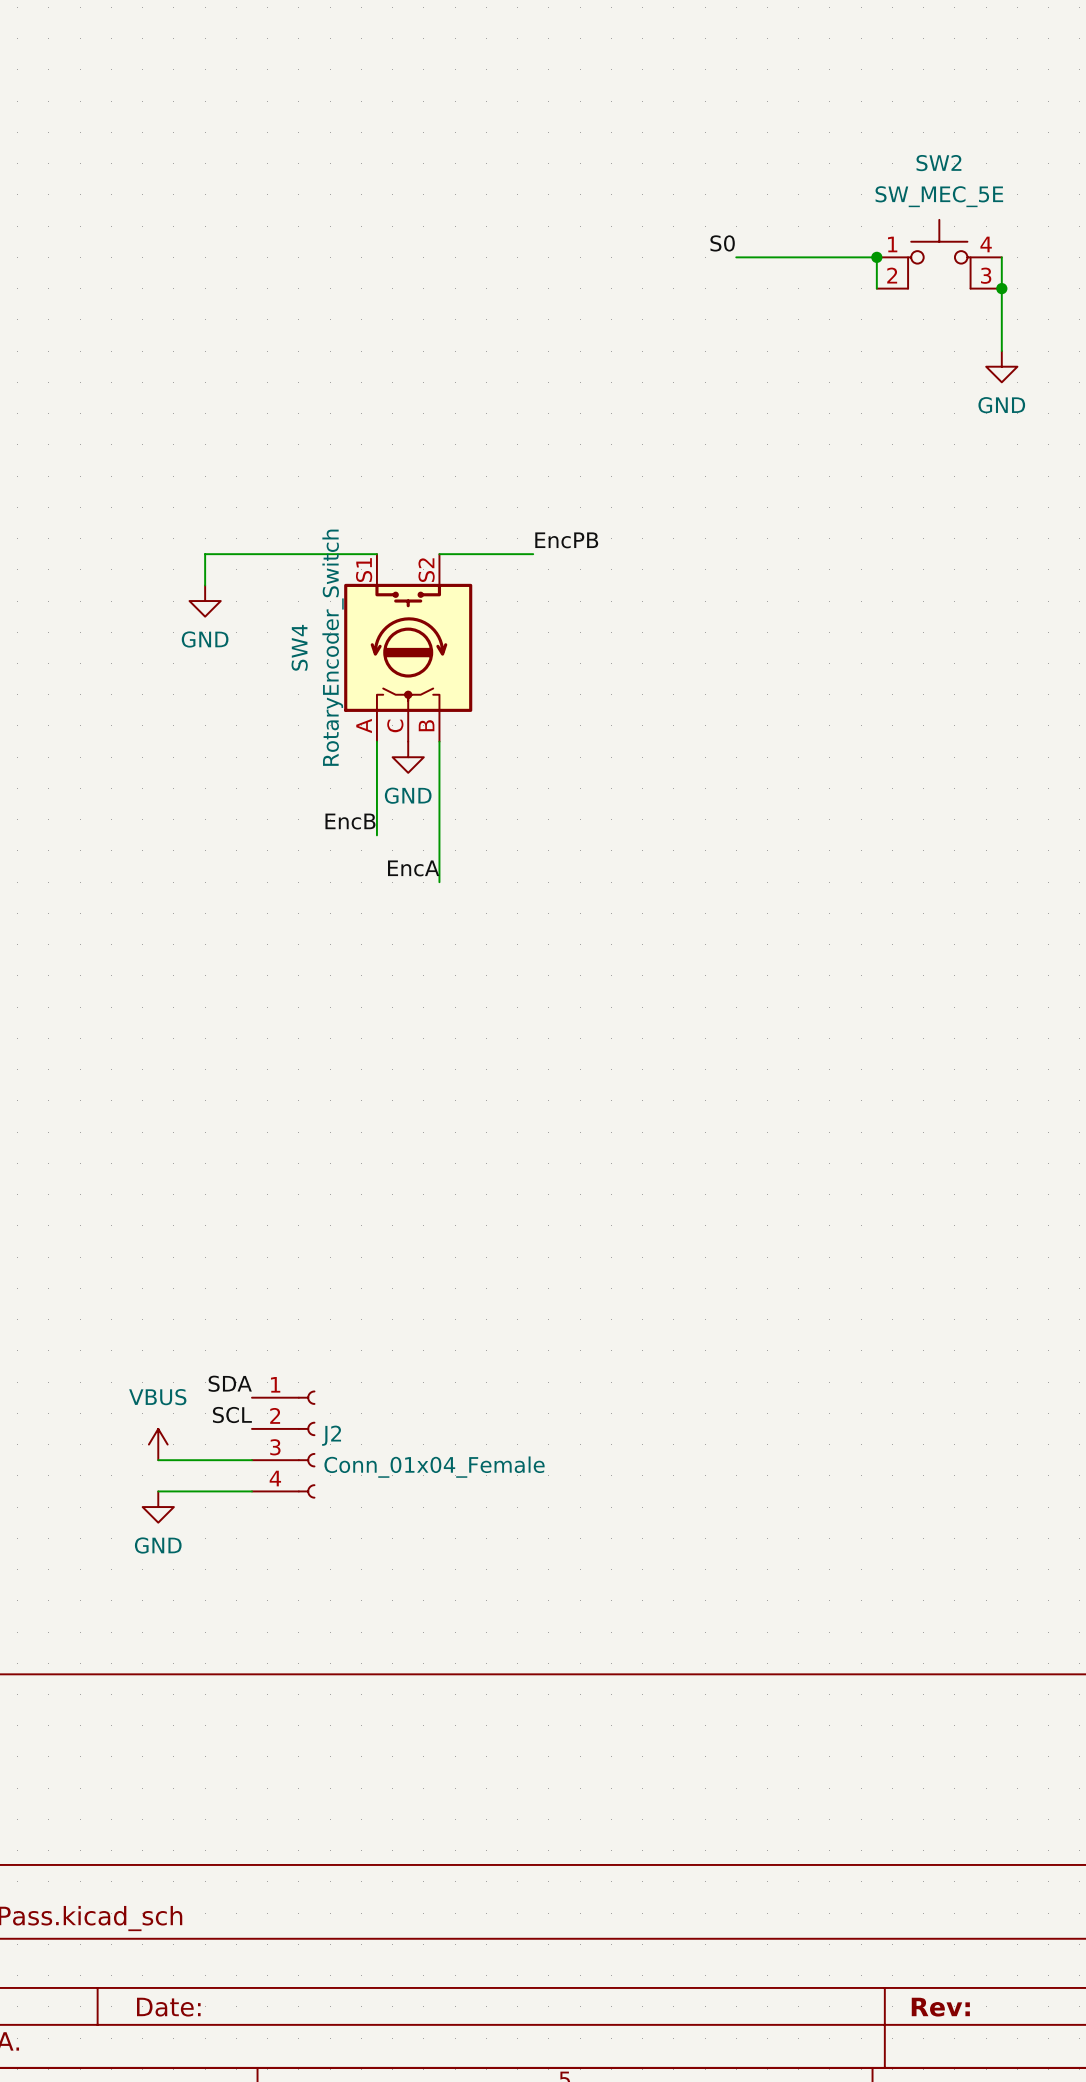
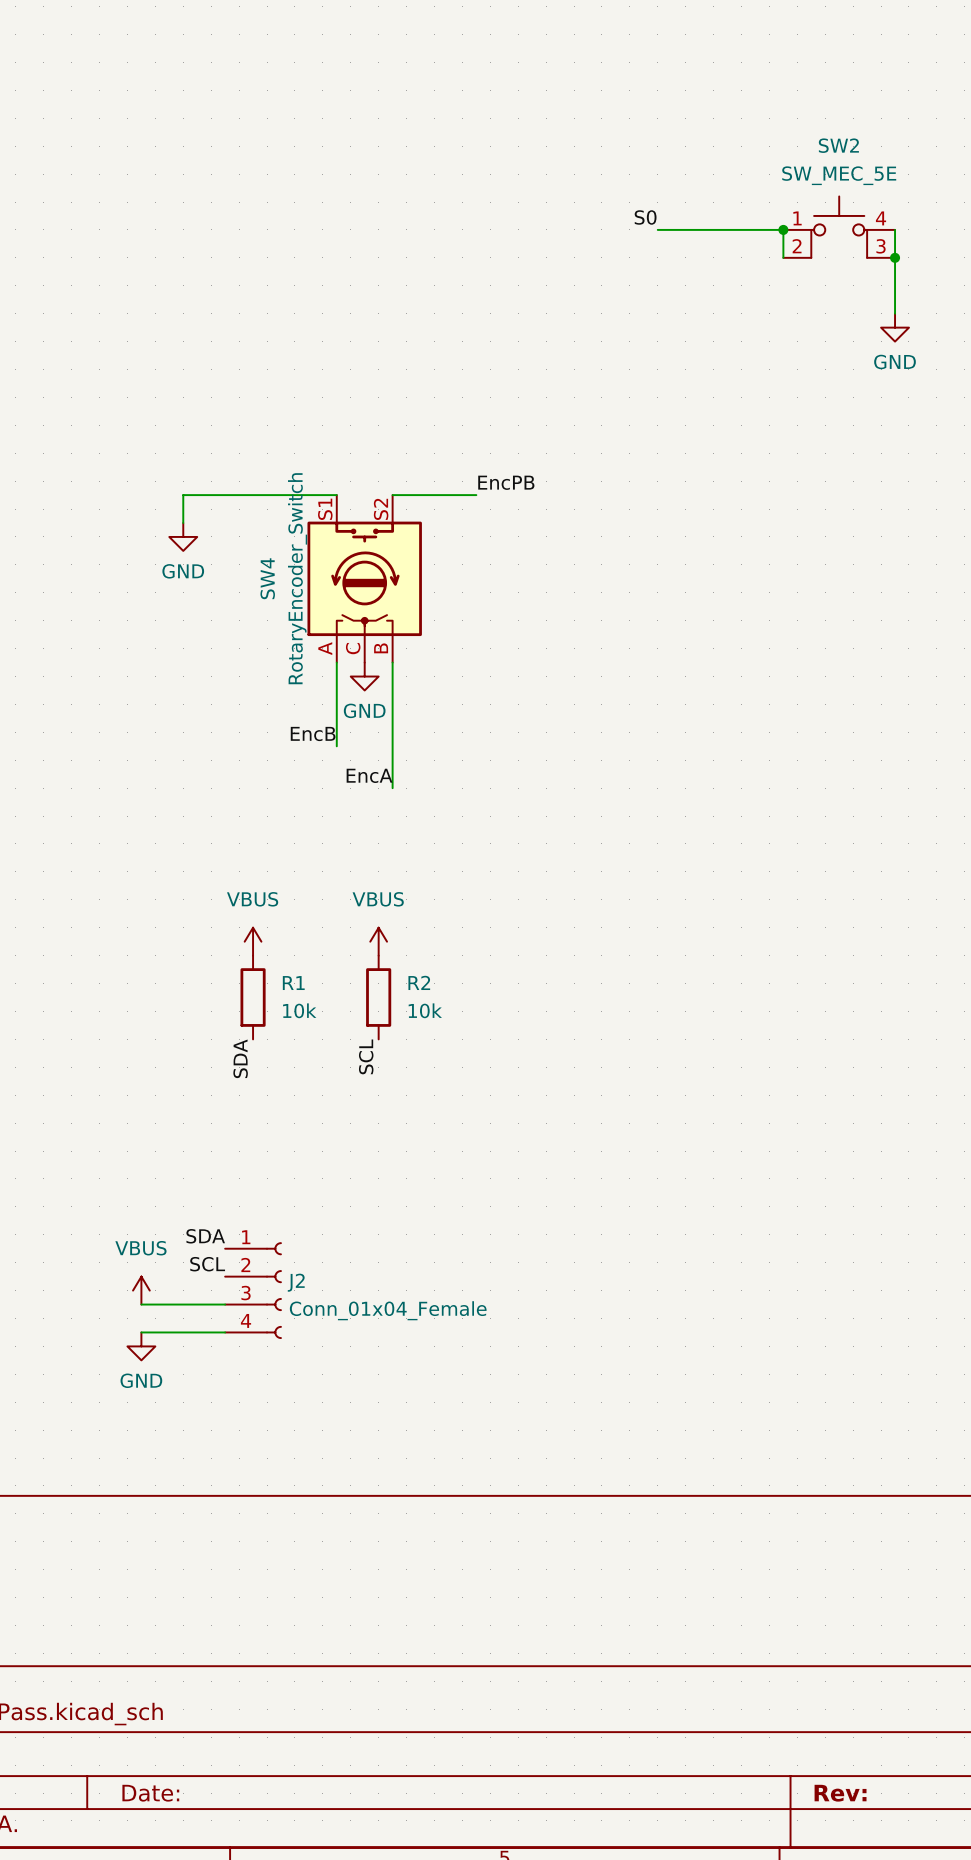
power symbol: none -> VBUS (253, 941)
power symbol: none -> VBUS (378, 941)
R1: none -> 10k (253, 997)
R2: none -> 10k (378, 997)
label: none -> SCL (366, 1056)
label: none -> SDA (240, 1058)

